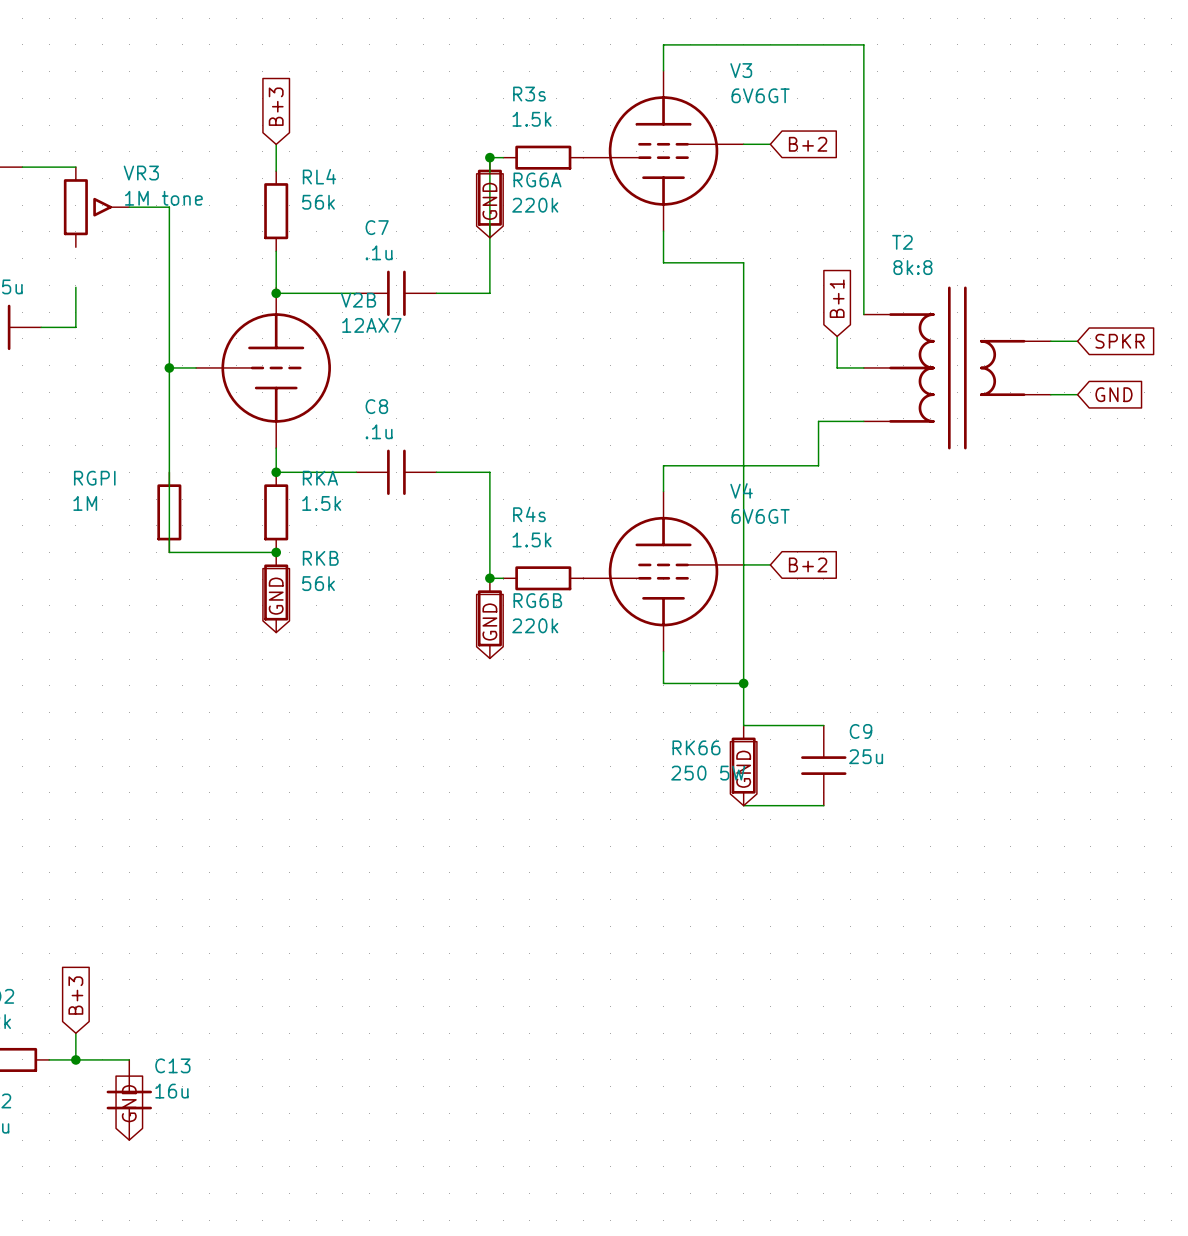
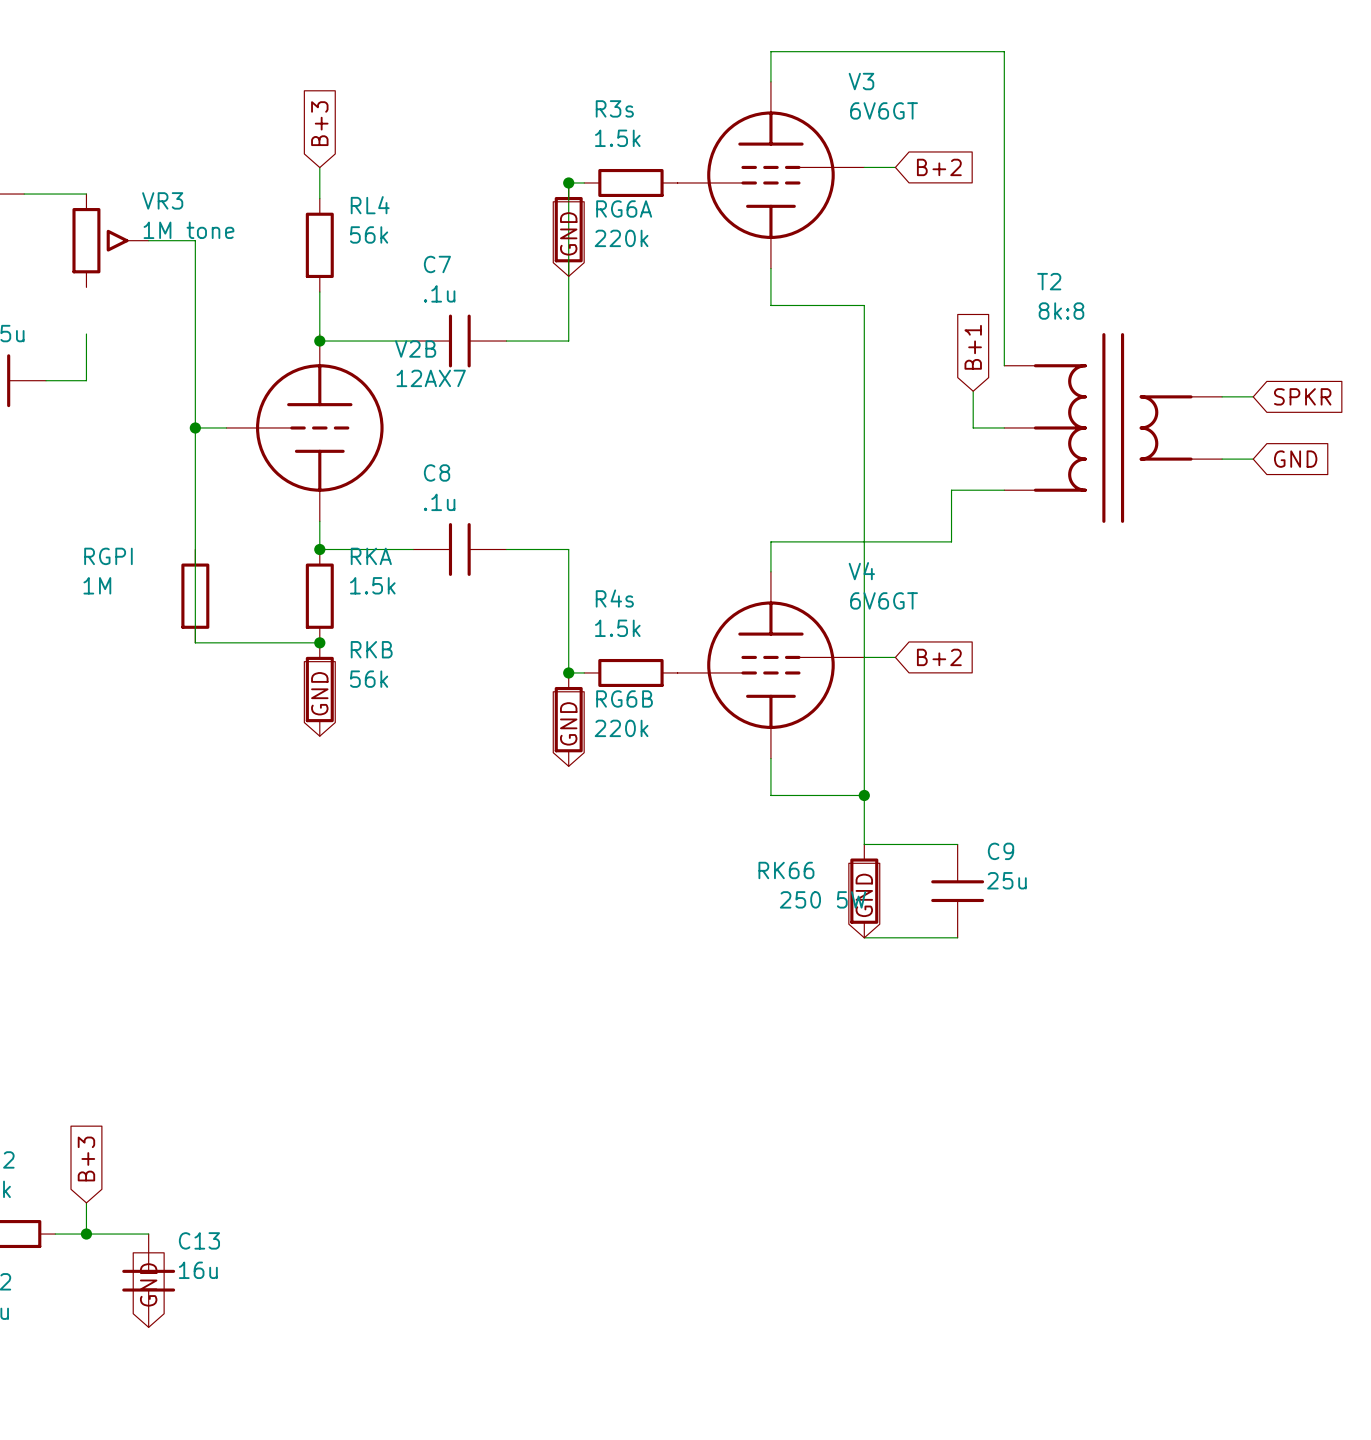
RK66 name position: RK66 (696, 747) -> RK66 (786, 870)

